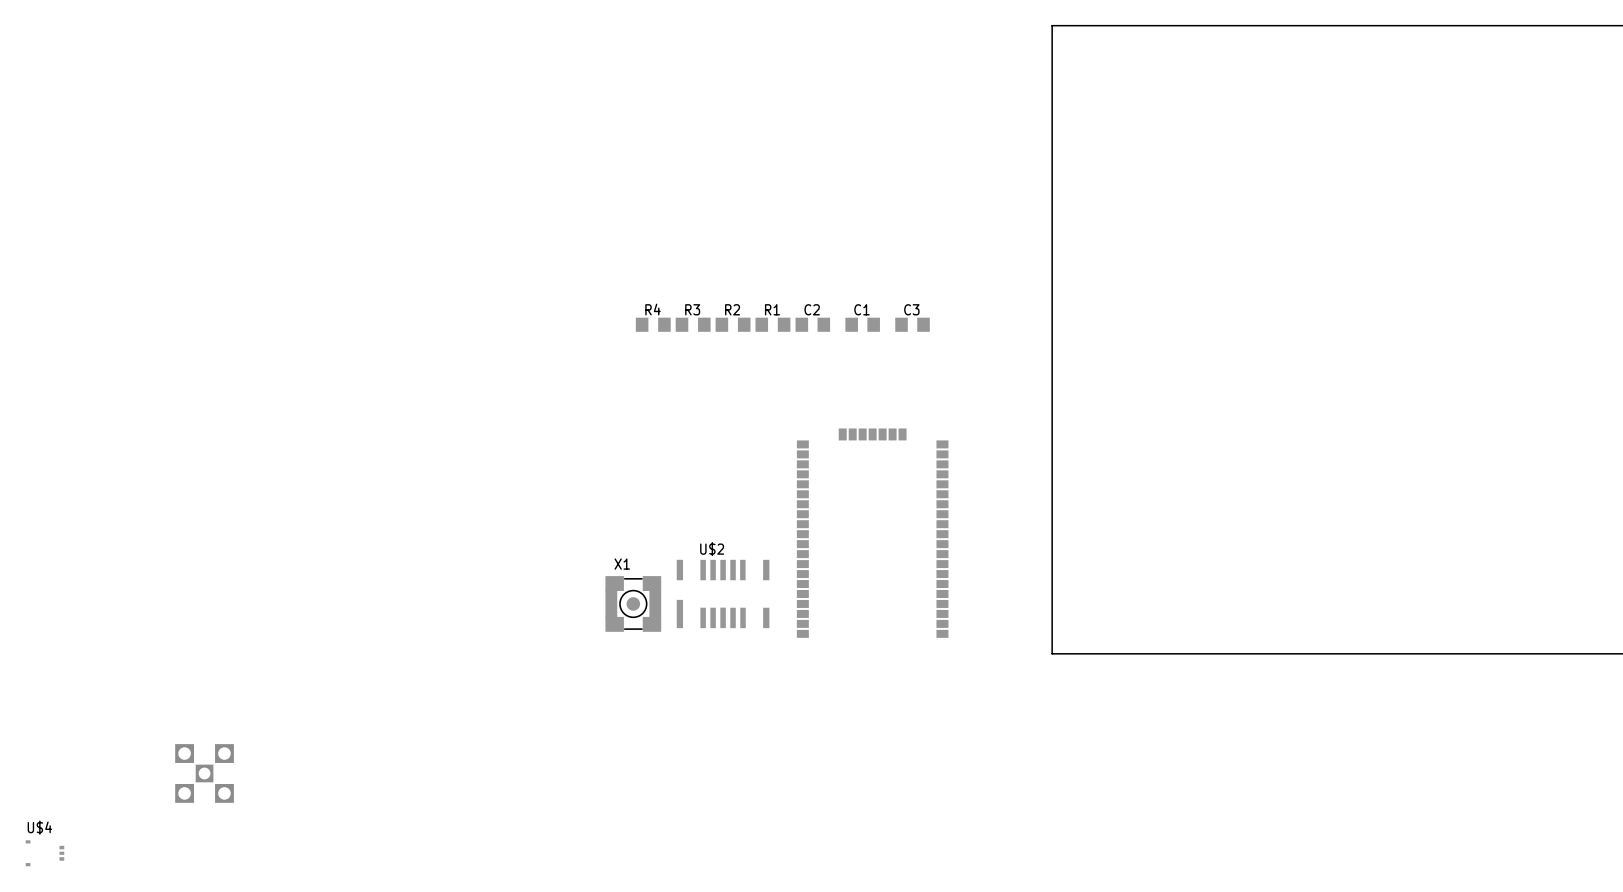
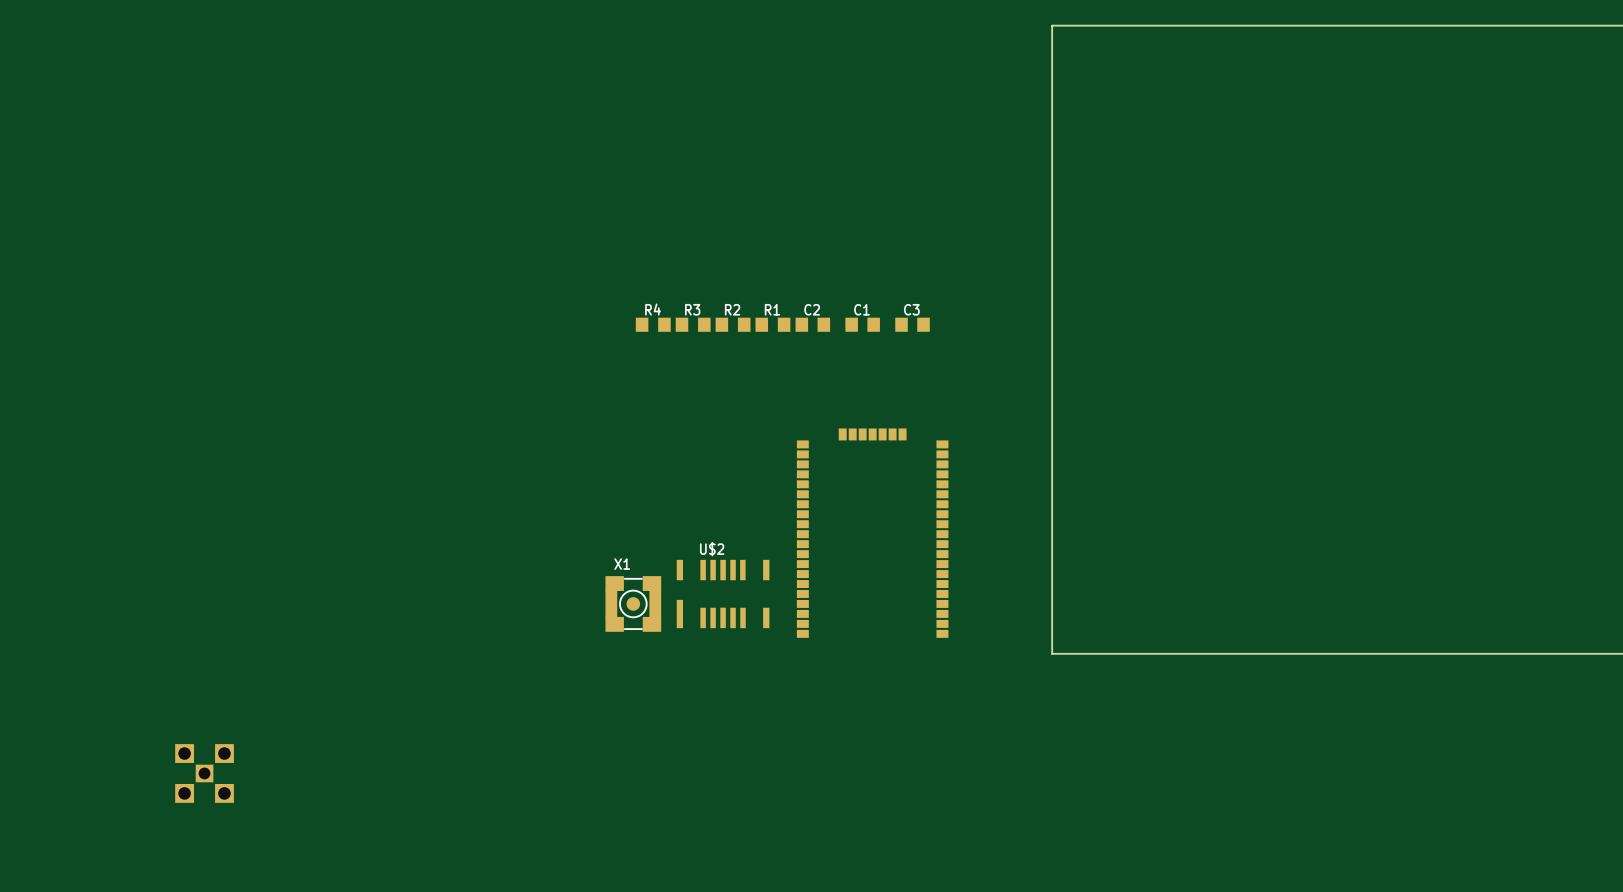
U$4: (44, 853) -> none

